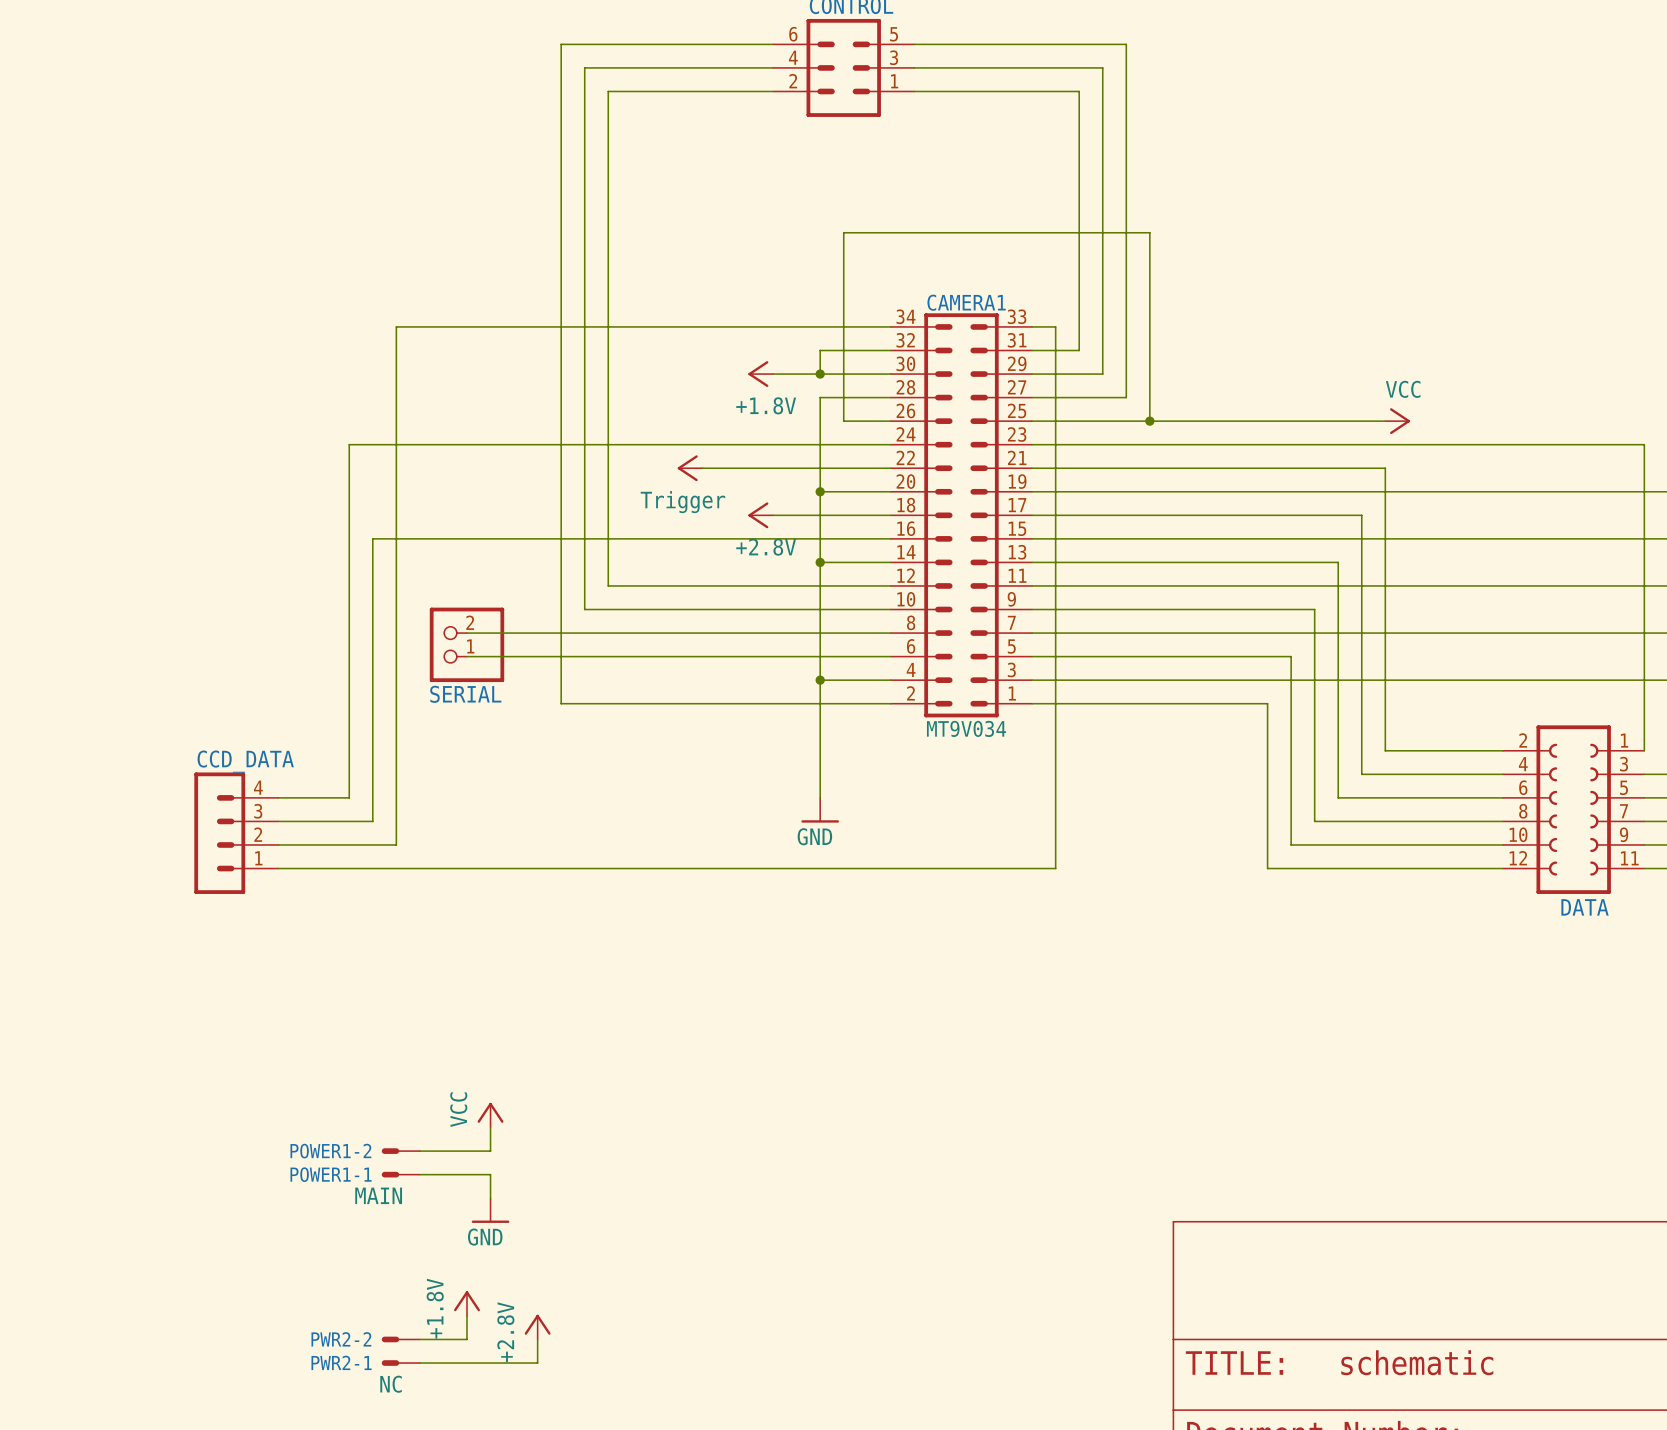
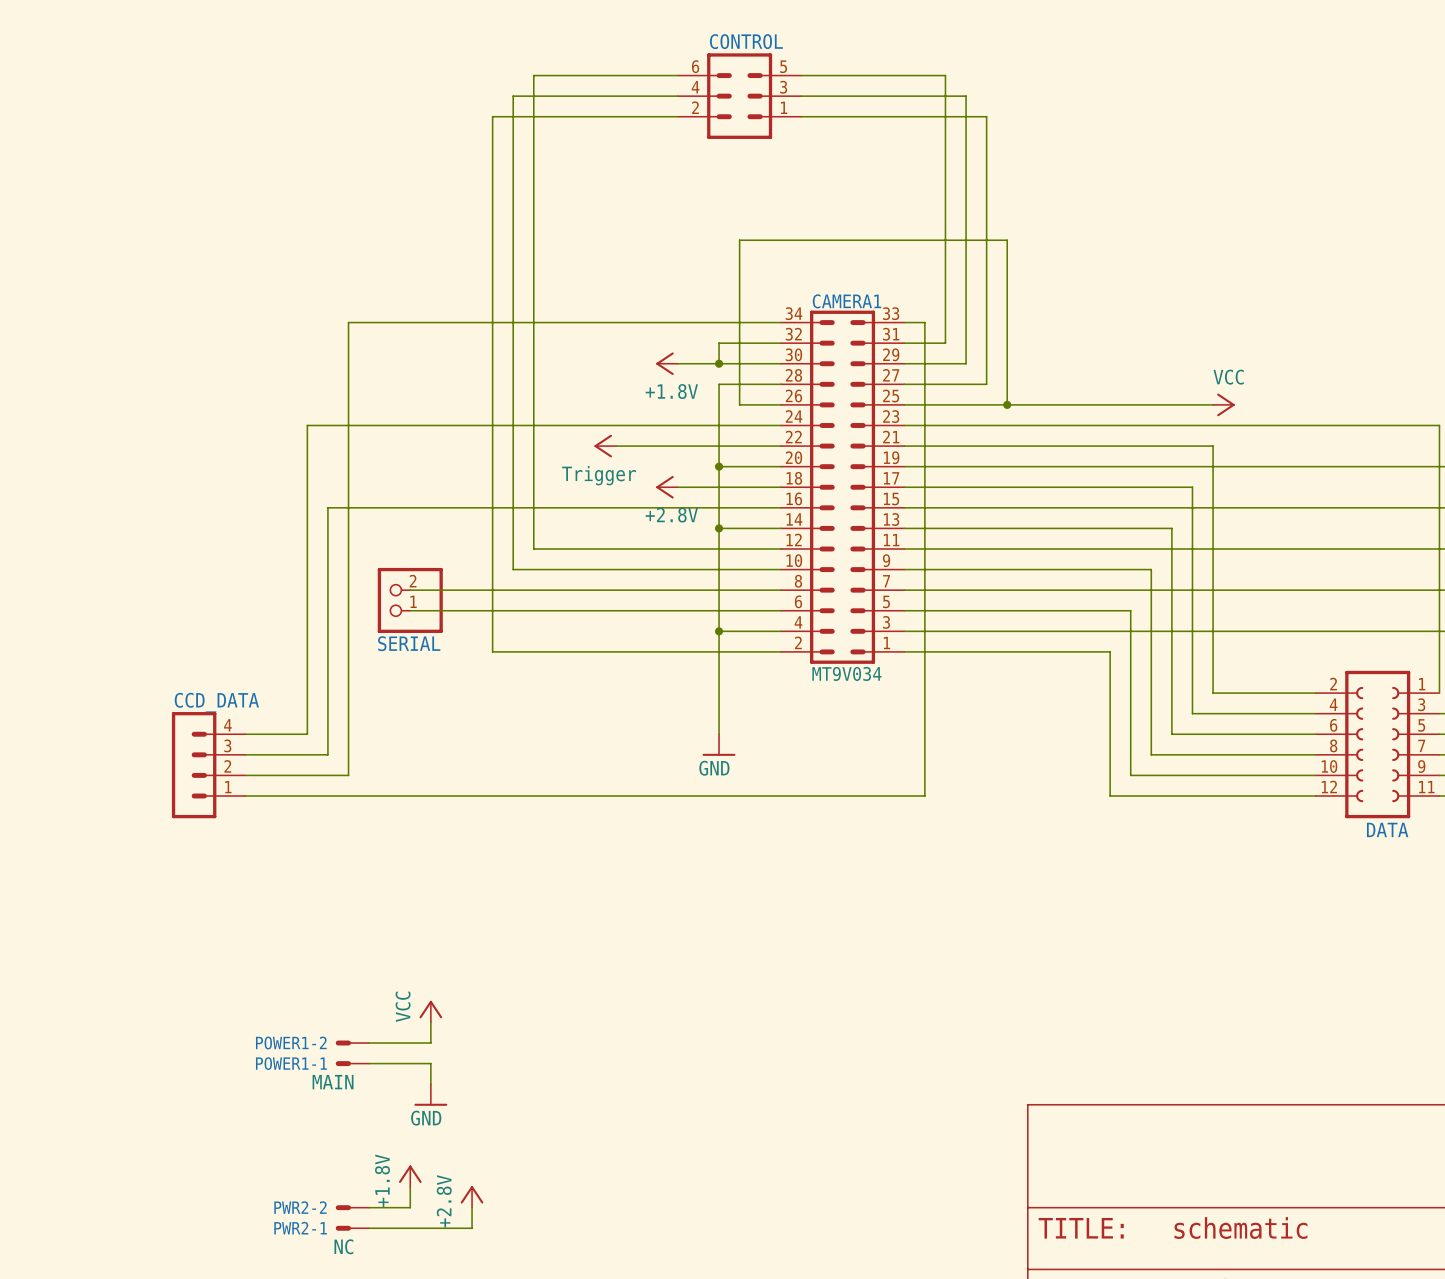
wire: (608, 44) (561, 44) (561, 91) -> (533, 75) (533, 116) (492, 116)
wire: (1079, 44) (1126, 44) (1126, 91) -> (945, 75) (945, 116) (986, 116)

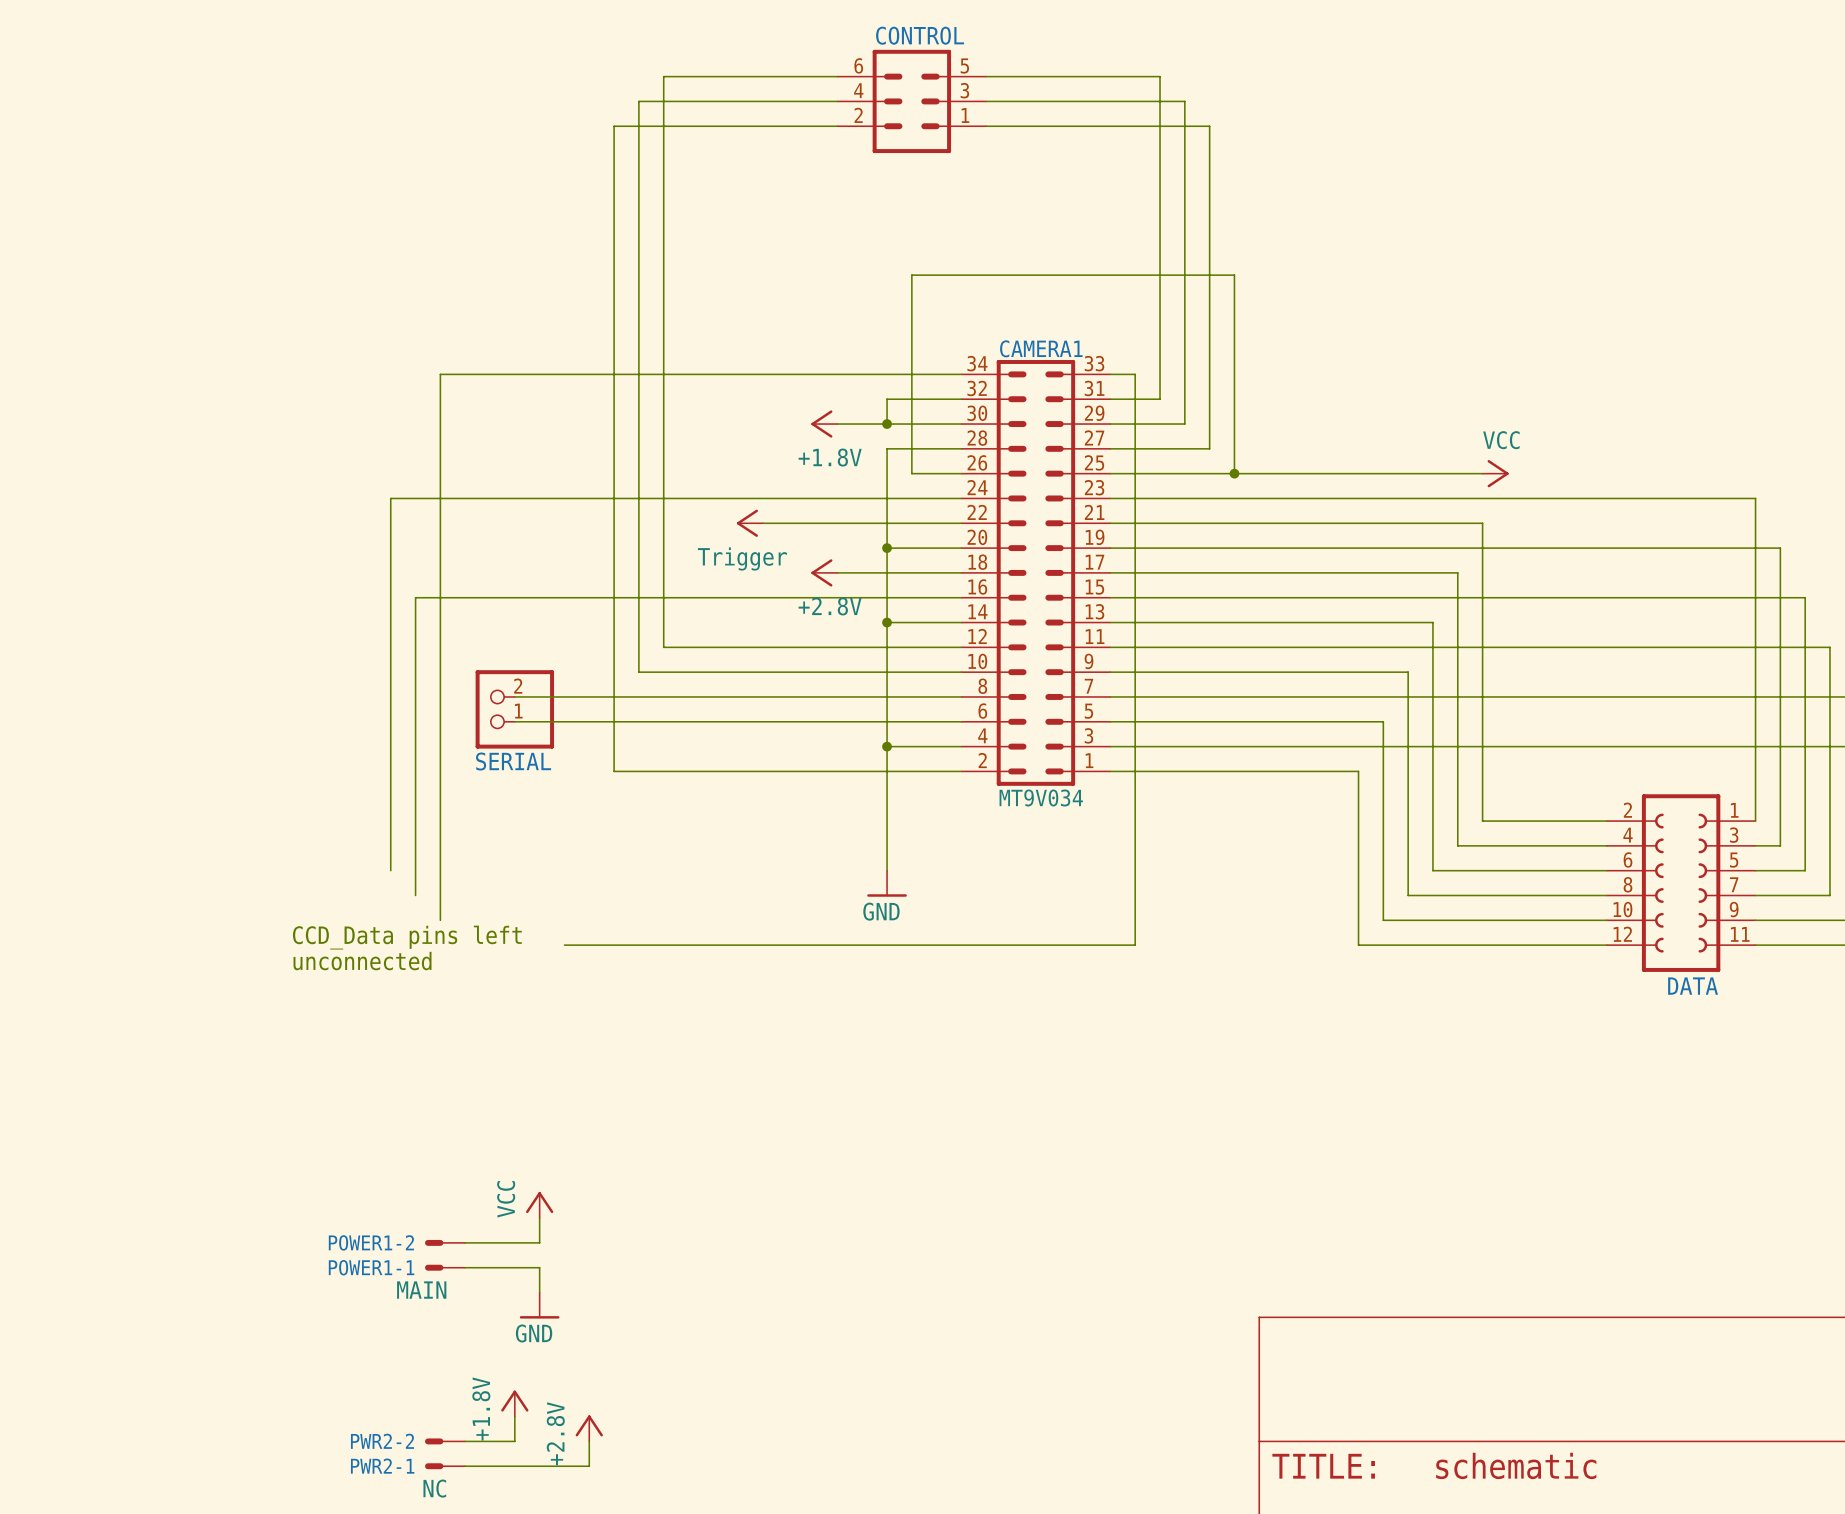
wire: (245, 734) (307, 734) -> none
wire: (245, 754) (327, 754) -> none
CCD_DATA: (208, 765) -> none
wire: (245, 775) (348, 775) -> none
text: none -> CCD_Data pins left (407, 937)
wire: (245, 796) (451, 796) -> none
text: none -> unconnected (362, 961)

